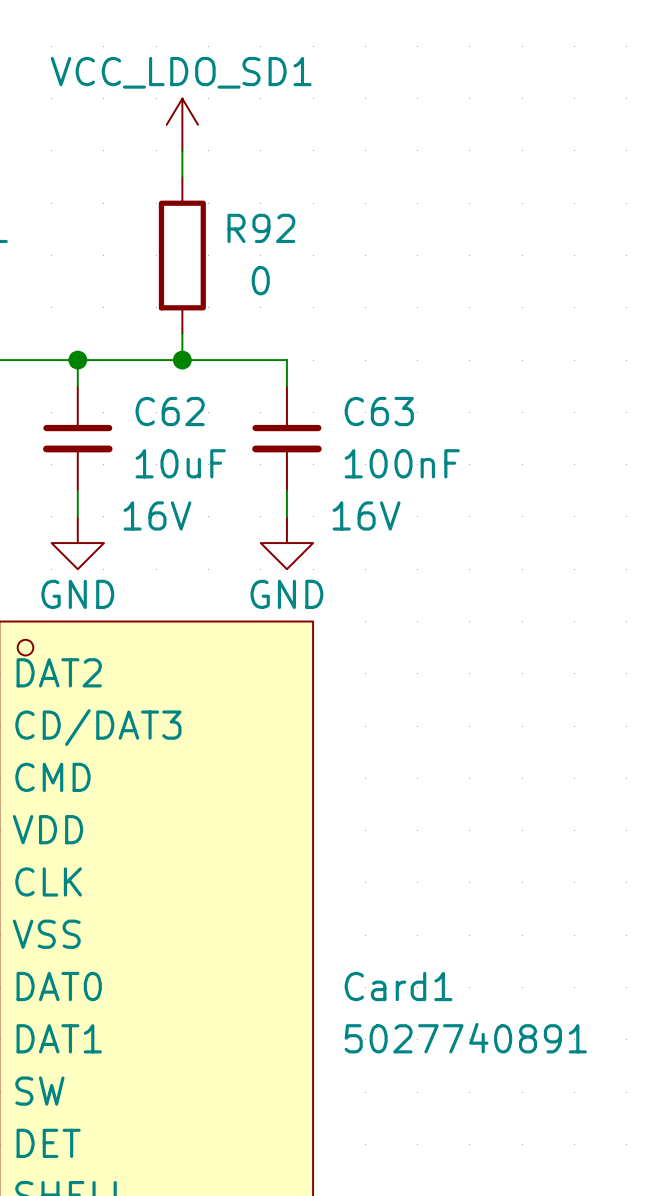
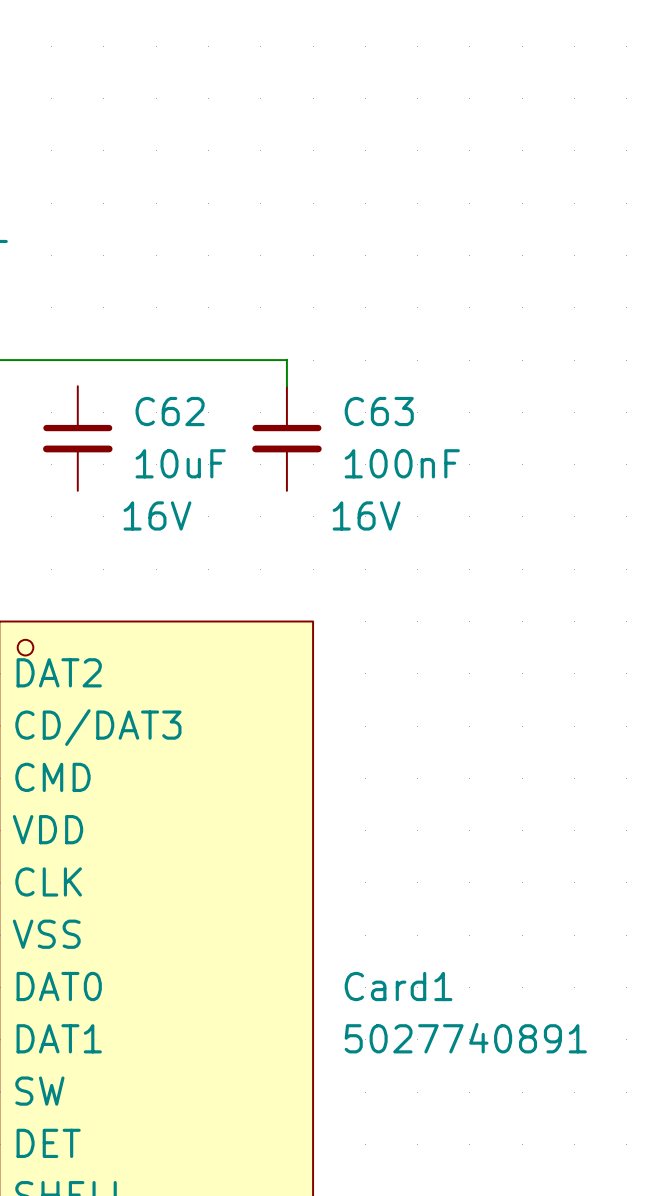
power symbol: VCC_LDO_SD1 (182, 124) -> none
wire: (182, 150) (182, 177) -> none
R92: 0 (182, 255) -> none
wire: (182, 333) (182, 360) -> none
wire: (77, 360) (77, 386) -> none
junction: (77, 360) -> none
junction: (182, 360) -> none
wire: (77, 490) (77, 516) -> none
wire: (286, 490) (286, 516) -> none
power symbol: GND (77, 543) -> none
power symbol: GND (286, 543) -> none

